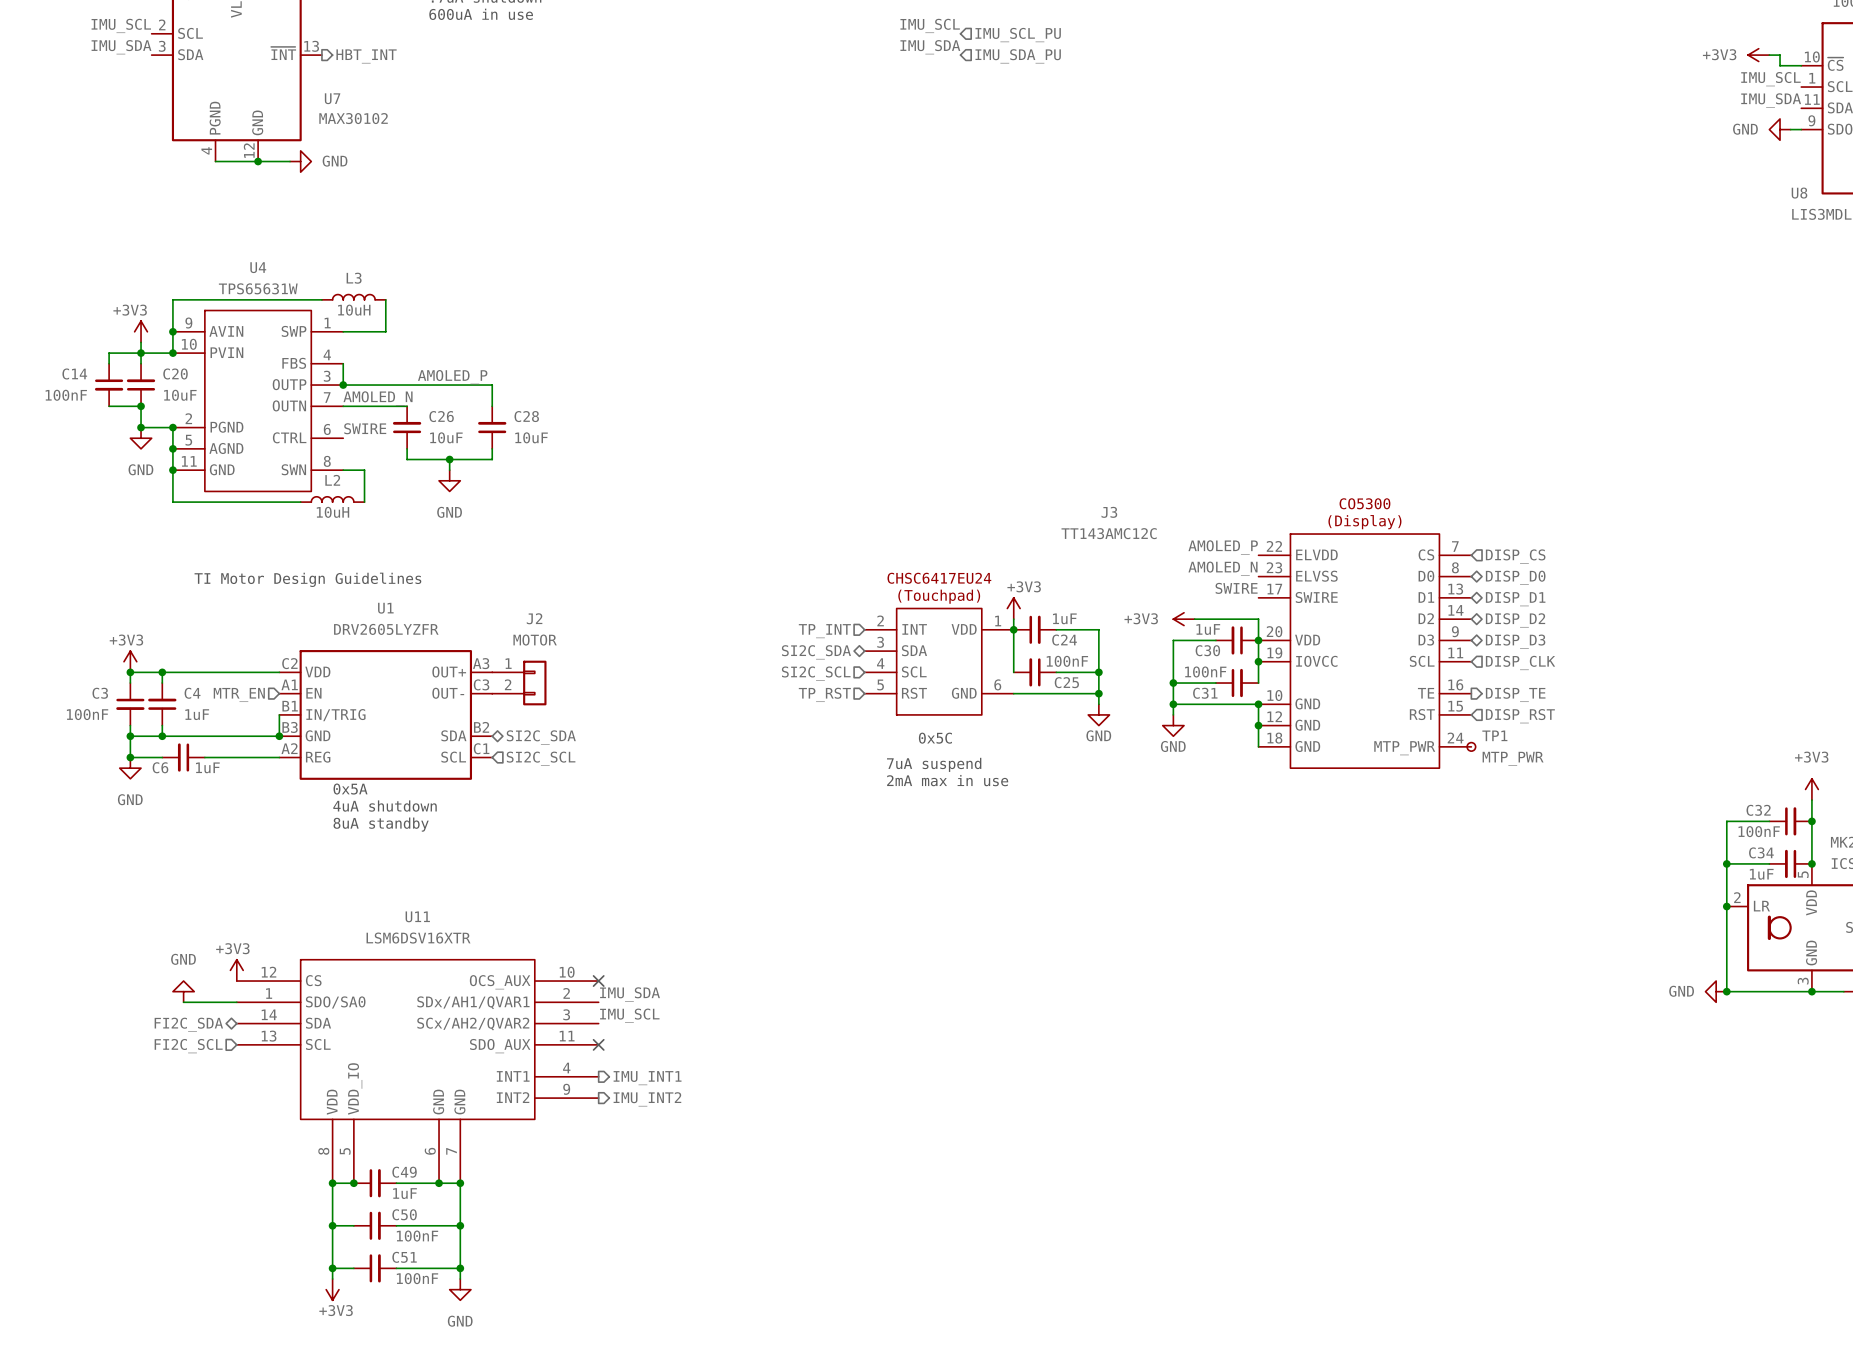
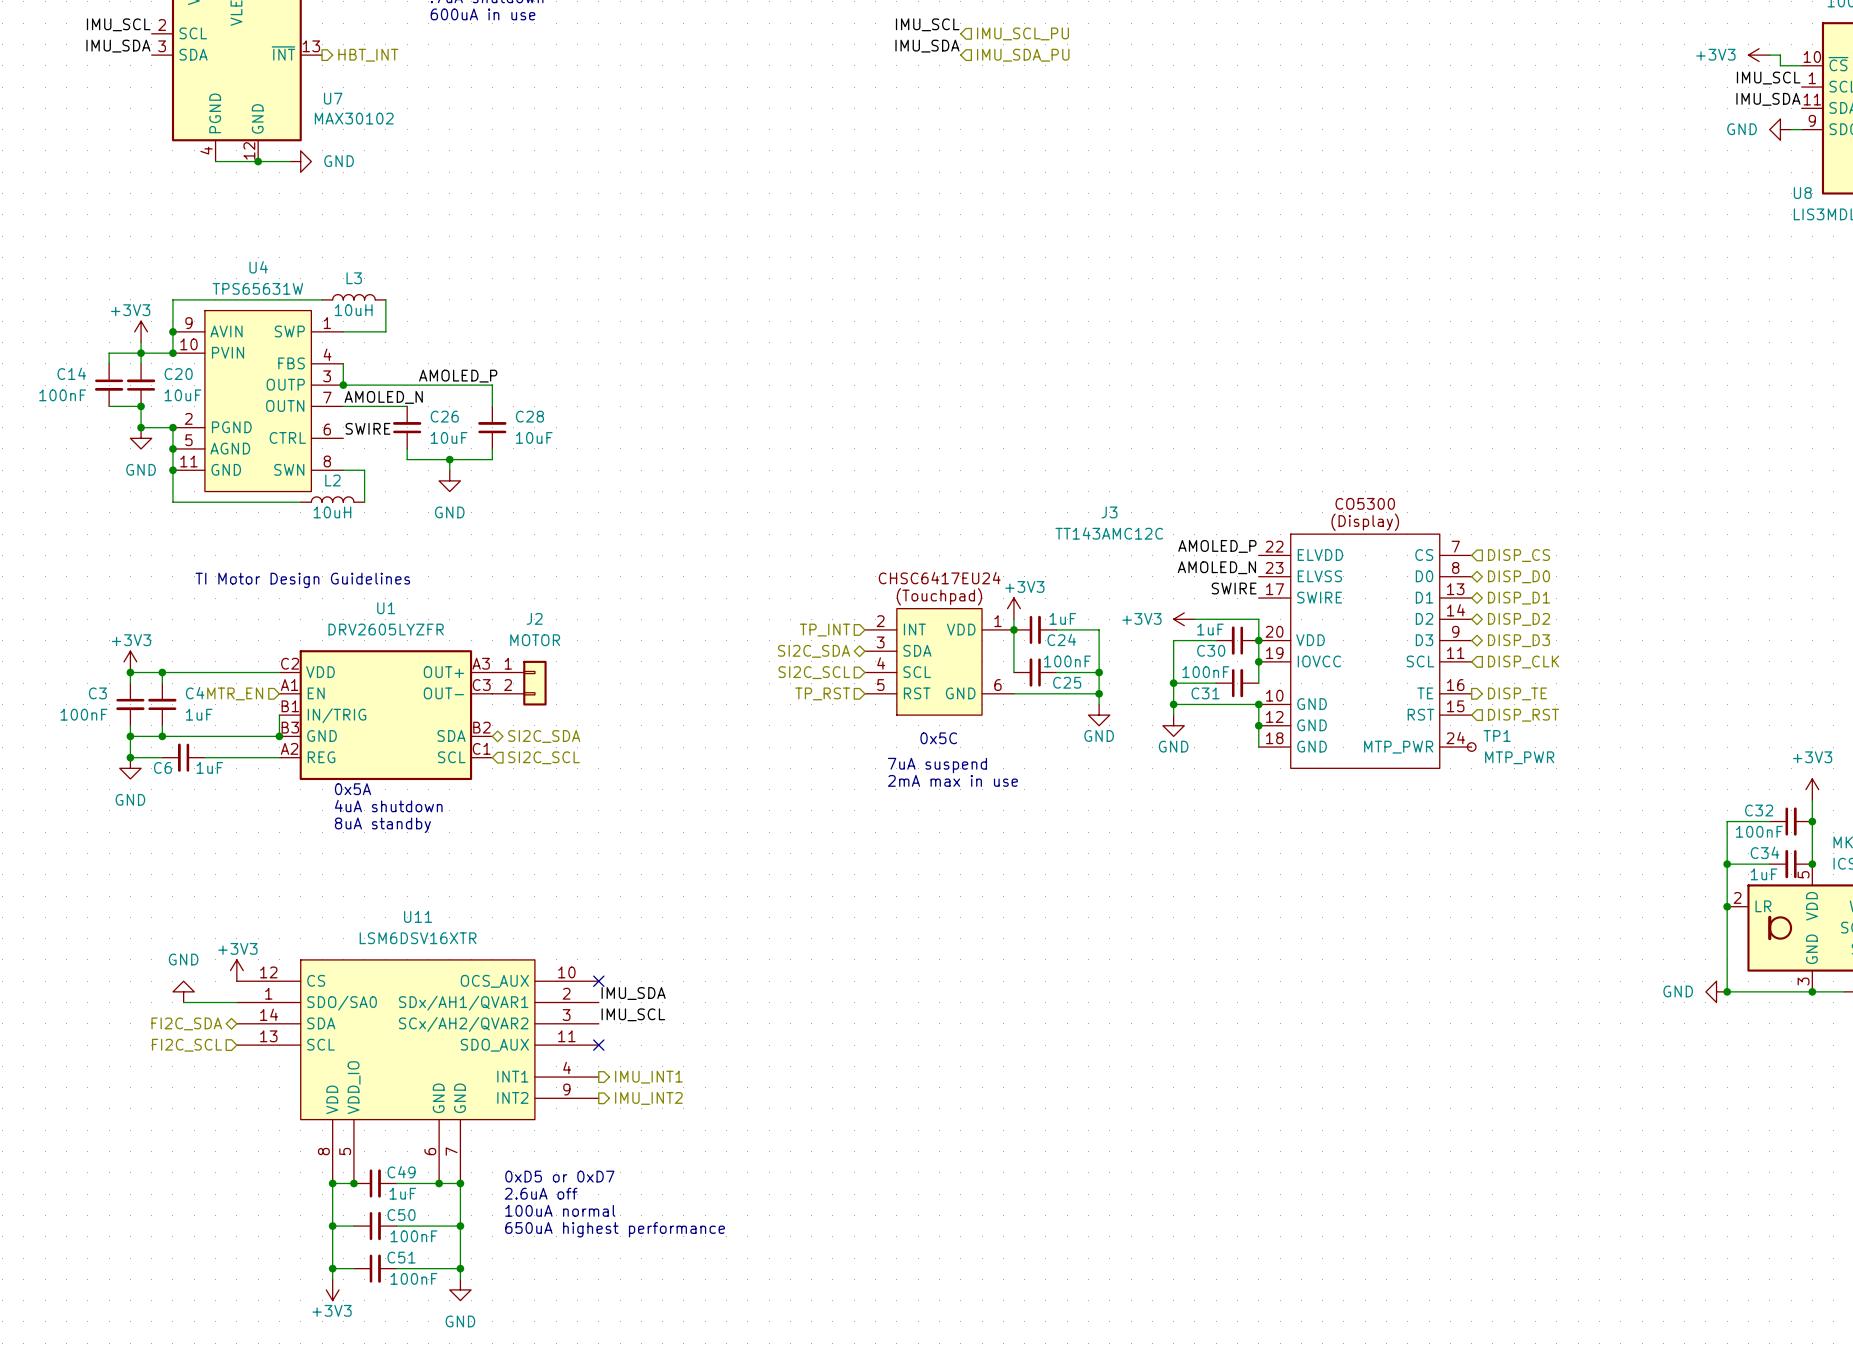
text: none -> 0xD5 or 0xD7 (559, 1176)
text: none -> 2.6uA off (541, 1193)
text: none -> 100uA normal (560, 1210)
text: none -> 650uA highest performance (615, 1229)

